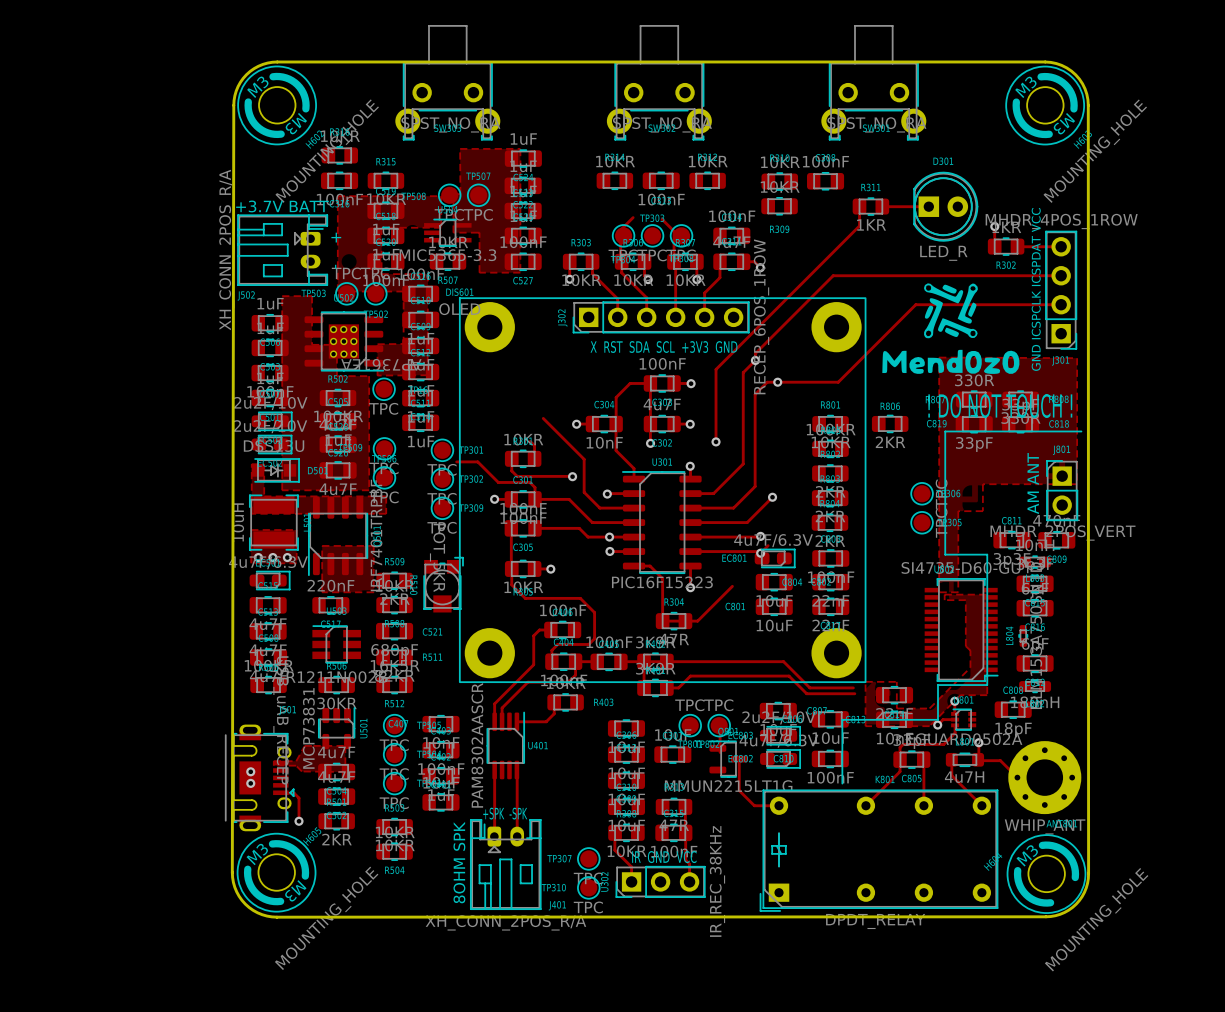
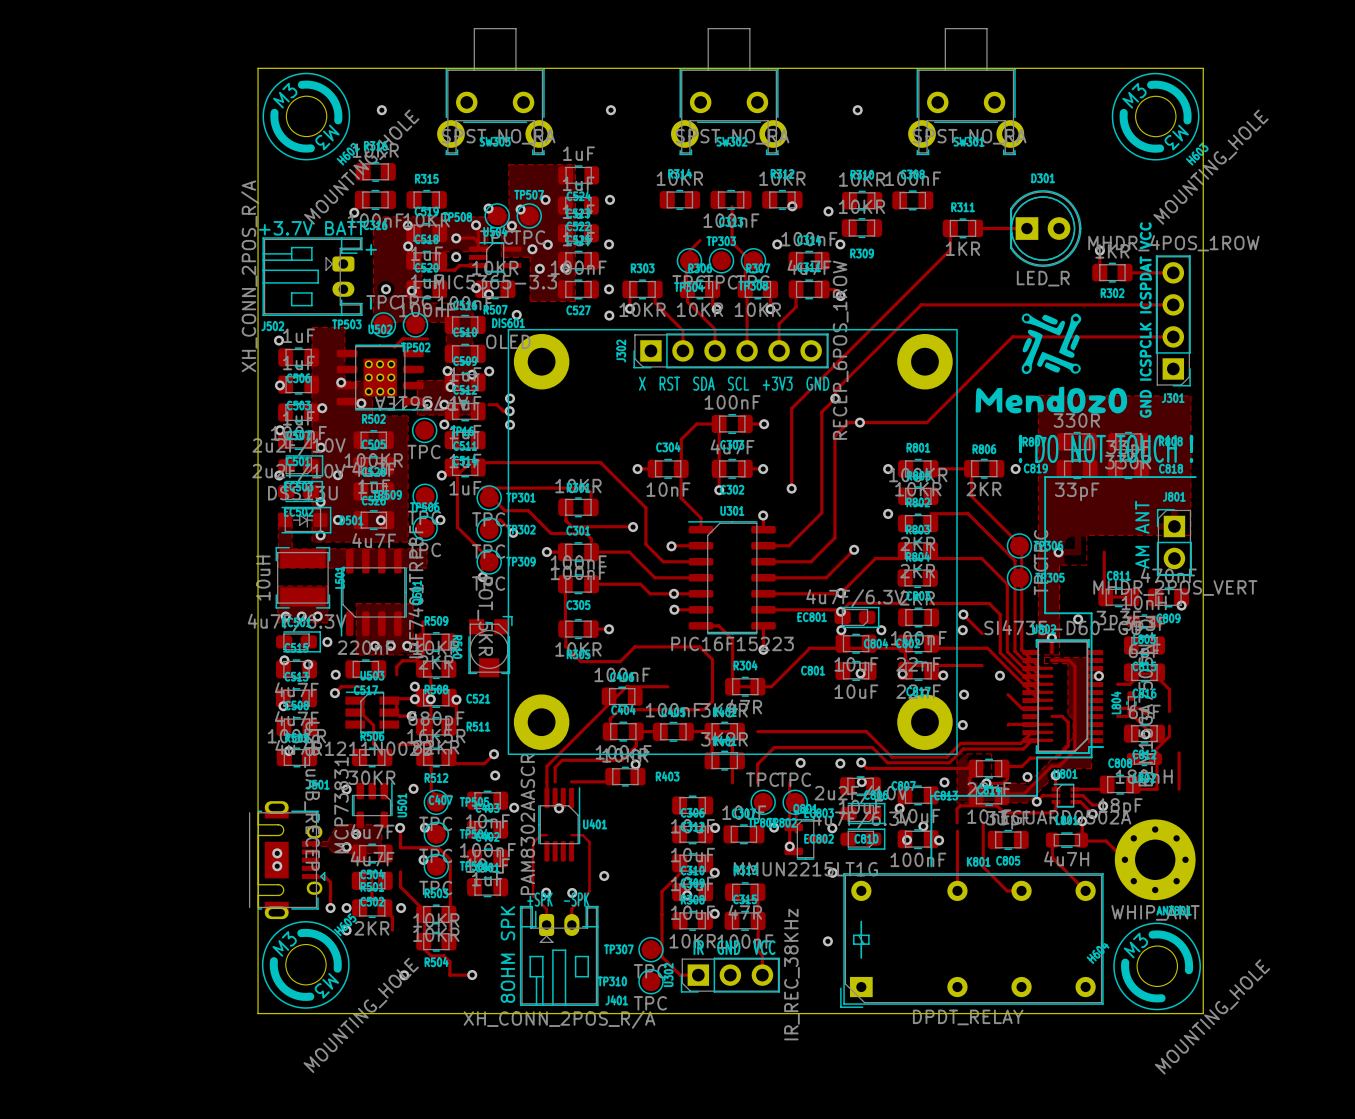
board edge: (277, 62) (1045, 61) (1061, 65) (1075, 74) (1085, 88) (1088, 105) (1088, 873) (1084, 892) (1076, 904) (1060, 914) (1045, 916) (276, 917) (262, 914) (245, 904) (236, 891) (232, 872) (233, 105) (236, 91) (246, 74) (262, 64) (277, 62) -> (258, 68) (258, 1013) (1203, 1013) (1203, 68) (258, 68)
via: none -> (381, 110)
via: none -> (610, 110)
via: none -> (857, 110)
via: none -> (545, 199)
via: none -> (610, 199)
track: none -> (732, 206) (732, 242)
via: none -> (792, 206)
via: none -> (488, 208)
via: none -> (520, 209)
via: none -> (828, 211)
via: none -> (354, 212)
via: none -> (407, 225)
track: none -> (476, 225) (478, 227) (478, 249)
via: none -> (476, 225)
via: none -> (511, 225)
track: none -> (456, 238) (473, 238) (478, 242)
via: none -> (456, 238)
via: none -> (547, 244)
via: none -> (609, 244)
via: none -> (777, 244)
via: none -> (840, 244)
via: none -> (408, 246)
via: none -> (532, 249)
via: none -> (456, 257)
track: none -> (478, 265) (459, 265) (454, 270) (437, 270)
via: none -> (565, 268)
via: none -> (539, 268)
via: none -> (476, 288)
via: none -> (386, 289)
via: none -> (609, 289)
via: none -> (411, 290)
via: none -> (488, 294)
via: none -> (516, 314)
via: none -> (609, 315)
track: none -> (427, 338) (402, 338) (394, 347)
via: none -> (279, 340)
via: none -> (447, 371)
via: none -> (489, 371)
via: none -> (472, 374)
via: none -> (341, 382)
via: none -> (279, 385)
via: none -> (450, 387)
via: none -> (510, 398)
via: none -> (361, 403)
via: none -> (427, 404)
via: none -> (444, 404)
track: none -> (489, 404) (497, 404) (503, 411) (509, 411)
via: none -> (322, 408)
via: none -> (509, 411)
via: none -> (444, 424)
via: none -> (510, 424)
via: none -> (279, 430)
via: none -> (320, 447)
track: none -> (600, 462) (469, 462) (457, 475) (457, 527) (482, 552) (482, 577)
via: none -> (888, 469)
track: none -> (930, 468) (971, 468) (971, 496) (1021, 546) (1021, 650) (1039, 668) (1051, 668)
via: none -> (1015, 469)
via: none -> (337, 475)
via: none -> (279, 475)
via: none -> (441, 475)
track: none -> (586, 488) (482, 488) (504, 510)
via: none -> (320, 502)
via: none -> (888, 513)
track: none -> (930, 513) (968, 513) (1015, 560) (1015, 651) (1039, 676) (1051, 676)
via: none -> (337, 520)
via: none -> (380, 520)
via: none -> (440, 520)
track: none -> (482, 520) (500, 520) (513, 532)
via: none -> (513, 532)
via: none -> (320, 535)
via: none -> (1058, 552)
track: none -> (1104, 552) (1104, 597) (1131, 597)
track: none -> (905, 558) (875, 558) (841, 593)
track: none -> (930, 558) (981, 558) (1007, 584) (1007, 651) (1039, 684) (1051, 684)
via: none -> (482, 577)
track: none -> (849, 603) (905, 603)
track: none -> (930, 603) (989, 603) (1000, 614) (1000, 652) (1039, 692) (1051, 692)
via: none -> (1181, 605)
track: none -> (963, 614) (982, 633)
via: none -> (963, 614)
via: none -> (1078, 619)
track: none -> (423, 621) (423, 653) (415, 660) (402, 660) (396, 666) (396, 674)
via: none -> (841, 630)
via: none -> (881, 630)
via: none -> (962, 630)
track: none -> (1051, 637) (1051, 652)
via: none -> (1051, 637)
via: none -> (327, 642)
via: none -> (375, 645)
via: none -> (390, 645)
via: none -> (407, 645)
track: none -> (809, 648) (905, 648) (905, 659) (911, 665) (982, 665)
track: none -> (930, 648) (987, 648) (1039, 700) (1051, 700)
via: none -> (284, 660)
track: none -> (1051, 660) (1068, 660) (1074, 666) (1074, 750) (1059, 766) (1051, 766) (1024, 793) (978, 793) (969, 785) (969, 778) (981, 766)
track: (560, 598) (580, 598) (594, 612) (594, 638) (588, 644) (557, 644) -> (620, 661) (634, 646) (699, 646) (712, 659) (712, 701) (703, 709) (619, 709) (616, 712)
via: none -> (308, 664)
track: none -> (430, 673) (431, 790) (436, 795) (450, 795)
via: none -> (860, 673)
via: none -> (902, 674)
via: none -> (335, 674)
via: none -> (943, 675)
via: none -> (999, 675)
via: none -> (1098, 676)
track: none -> (1117, 684) (1130, 684) (1140, 673) (1154, 673) (1169, 689) (1169, 711)
track: none -> (362, 686) (341, 686) (334, 693)
via: none -> (414, 686)
via: none -> (334, 693)
via: none -> (964, 694)
track: none -> (1007, 694) (1021, 708) (1051, 708)
track: (554, 629) (539, 629) (533, 635) (533, 664) (494, 703) -> (667, 686) (626, 686) (546, 766) (546, 778)
track: none -> (362, 698) (362, 714) (373, 725) (373, 744)
track: none -> (414, 699) (396, 698) (396, 713) (399, 716) (411, 716)
via: none -> (414, 699)
via: none -> (430, 699)
track: none -> (456, 699) (456, 718)
via: none -> (456, 699)
via: none -> (283, 706)
track: none -> (1117, 708) (1139, 708) (1145, 713)
via: none -> (411, 716)
track: none -> (1051, 716) (1062, 716) (1068, 722) (1068, 746) (1056, 758) (1030, 758) (1022, 766) (1009, 766)
track: none -> (1117, 716) (1133, 716) (1145, 728) (1145, 734)
via: none -> (962, 725)
track: none -> (1051, 724) (1008, 725)
track: none -> (1169, 725) (1169, 736) (1154, 750) (1156, 752) (1156, 789) (1129, 789)
track: none -> (732, 731) (732, 782)
track: (667, 661) (685, 661) -> none
via: none -> (1145, 734)
track: none -> (431, 744) (398, 744)
track: (575, 674) (568, 682) (527, 682) (502, 708) (502, 721) -> (636, 745) (621, 760) (562, 760) (555, 767) (555, 781)
track: (700, 676) (690, 676) (678, 687) (666, 687) -> (774, 747) (757, 764) (757, 782)
via: none -> (288, 751)
track: none -> (1179, 752) (1179, 789)
track: none -> (494, 754) (484, 763) (456, 763)
via: none -> (494, 754)
track: (806, 684) (809, 687) (853, 687) -> (891, 757) (947, 757) (960, 743) (1021, 743) (1032, 732) (1051, 732)
via: none -> (800, 762)
track: none -> (861, 762) (867, 768) (979, 768)
via: none -> (861, 762)
track: (802, 689) (806, 693) (854, 693) -> (887, 762) (949, 762) (963, 749) (1023, 749) (1032, 740) (1051, 740)
via: none -> (840, 763)
via: none -> (635, 764)
track: none -> (1007, 766) (1007, 778) (1003, 783) (986, 783)
via: none -> (495, 775)
track: (554, 702) (554, 713) (546, 721) (516, 721) -> none
via: none -> (1027, 776)
track: none -> (571, 781) (609, 781)
via: none -> (861, 782)
via: none -> (944, 782)
track: none -> (789, 782) (789, 846)
via: none -> (986, 783)
via: none -> (413, 788)
track: none -> (1075, 789) (1103, 789)
via: none -> (346, 789)
track: none -> (1074, 795) (1083, 795) (1092, 804) (1103, 806)
track: none -> (1074, 801) (1080, 801) (1092, 814)
via: none -> (1103, 806)
via: none -> (514, 807)
via: none -> (559, 808)
via: none -> (899, 808)
track: (955, 731) (943, 744) (903, 744) (900, 747) (900, 771) (865, 805) -> (1056, 808) (1051, 812) (1004, 812) (997, 805) (960, 805) (957, 808) (957, 822)
via: none -> (1092, 814)
via: none -> (923, 826)
track: none -> (400, 827) (400, 847) (438, 847) (450, 859) (449, 930)
via: none -> (400, 827)
via: none -> (424, 827)
via: none -> (715, 827)
via: none -> (774, 827)
via: none -> (832, 828)
track: none -> (957, 831) (957, 890)
via: none -> (356, 834)
track: (739, 759) (739, 790) (754, 805) (779, 805) -> none
via: none -> (907, 840)
track: (922, 759) (923, 761) (923, 805) -> (983, 822) (983, 866) (1007, 890) (1021, 890)
via: none -> (939, 840)
via: none -> (789, 846)
via: none -> (346, 847)
track: (494, 770) (494, 836) -> (546, 835) (540, 835) (533, 842) (533, 895) (546, 909) (546, 924)
track: (516, 770) (517, 821) -> (571, 835) (582, 835) (589, 842) (589, 891) (571, 908)
via: none -> (423, 859)
track: none -> (371, 871) (371, 896) (392, 917) (392, 930)
track: none -> (400, 871) (400, 886) (424, 911) (424, 949) (431, 955) (443, 955) (449, 961) (449, 975) (472, 975)
via: none -> (714, 872)
via: none -> (832, 872)
via: none -> (604, 876)
via: none -> (546, 892)
via: none -> (572, 892)
via: none -> (687, 895)
via: none -> (346, 908)
via: none -> (401, 908)
via: none -> (714, 913)
track: (615, 832) (614, 850) (631, 866) (631, 881) -> (687, 866) (661, 891) (661, 956) (680, 975) (698, 975)
via: none -> (346, 930)
via: none -> (827, 941)
via: none -> (472, 975)
via: none -> (404, 975)

